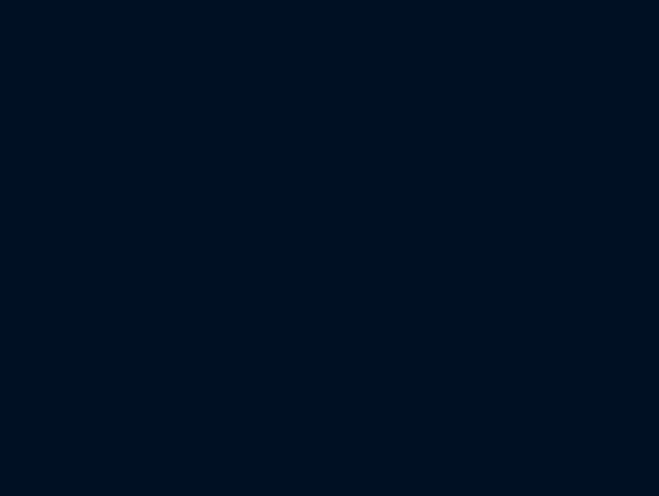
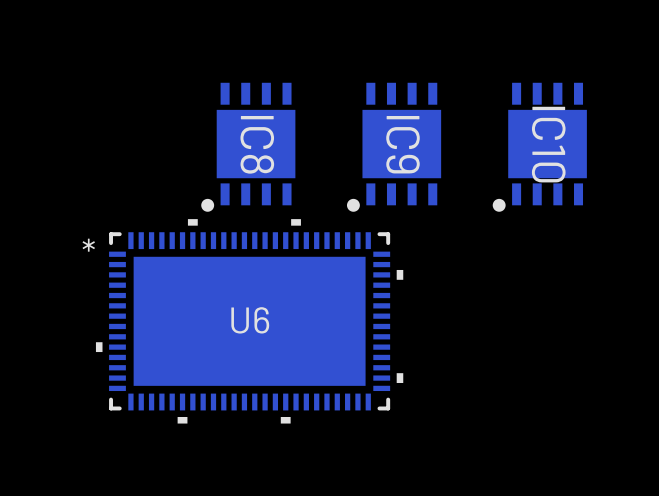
IC8: none -> (248, 147)
IC9: none -> (394, 147)
IC10: none -> (539, 147)
U6: none -> (249, 321)

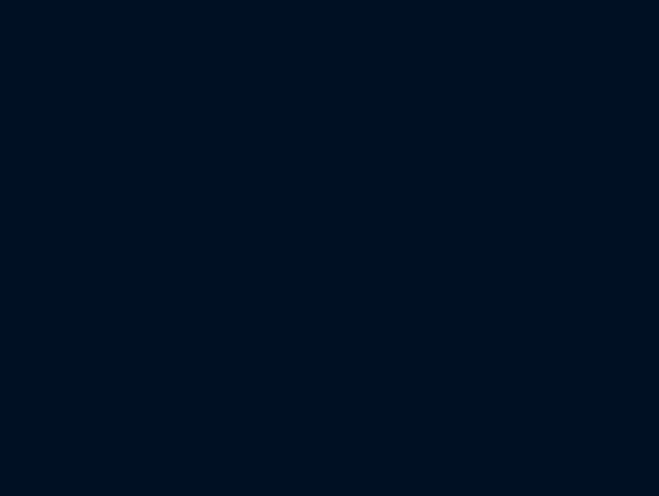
IC8: (248, 147) -> none
IC9: (394, 147) -> none
IC10: (539, 147) -> none
U6: (249, 321) -> none

